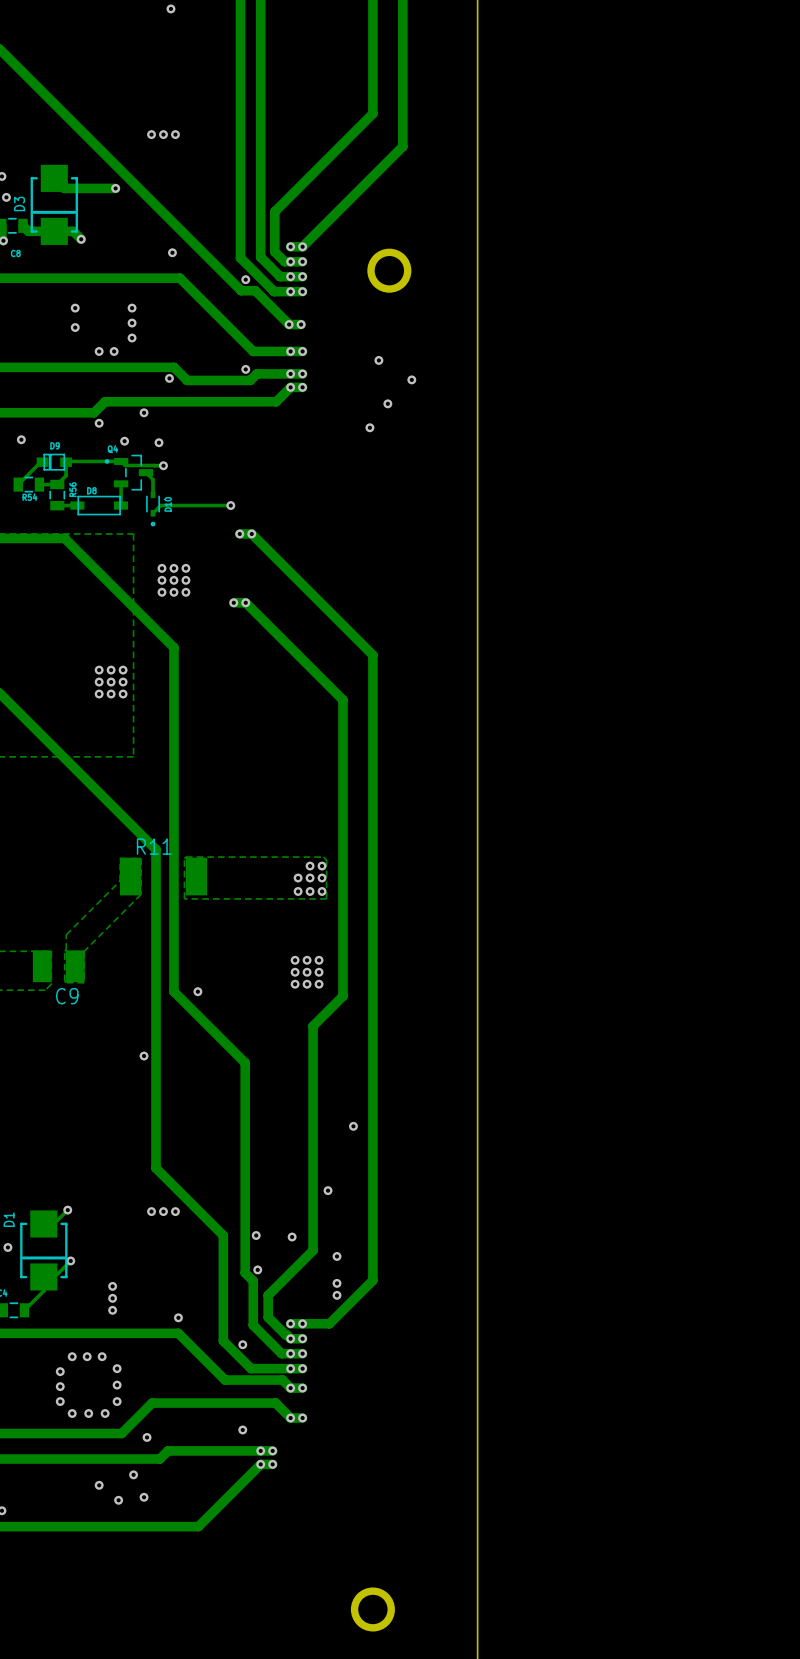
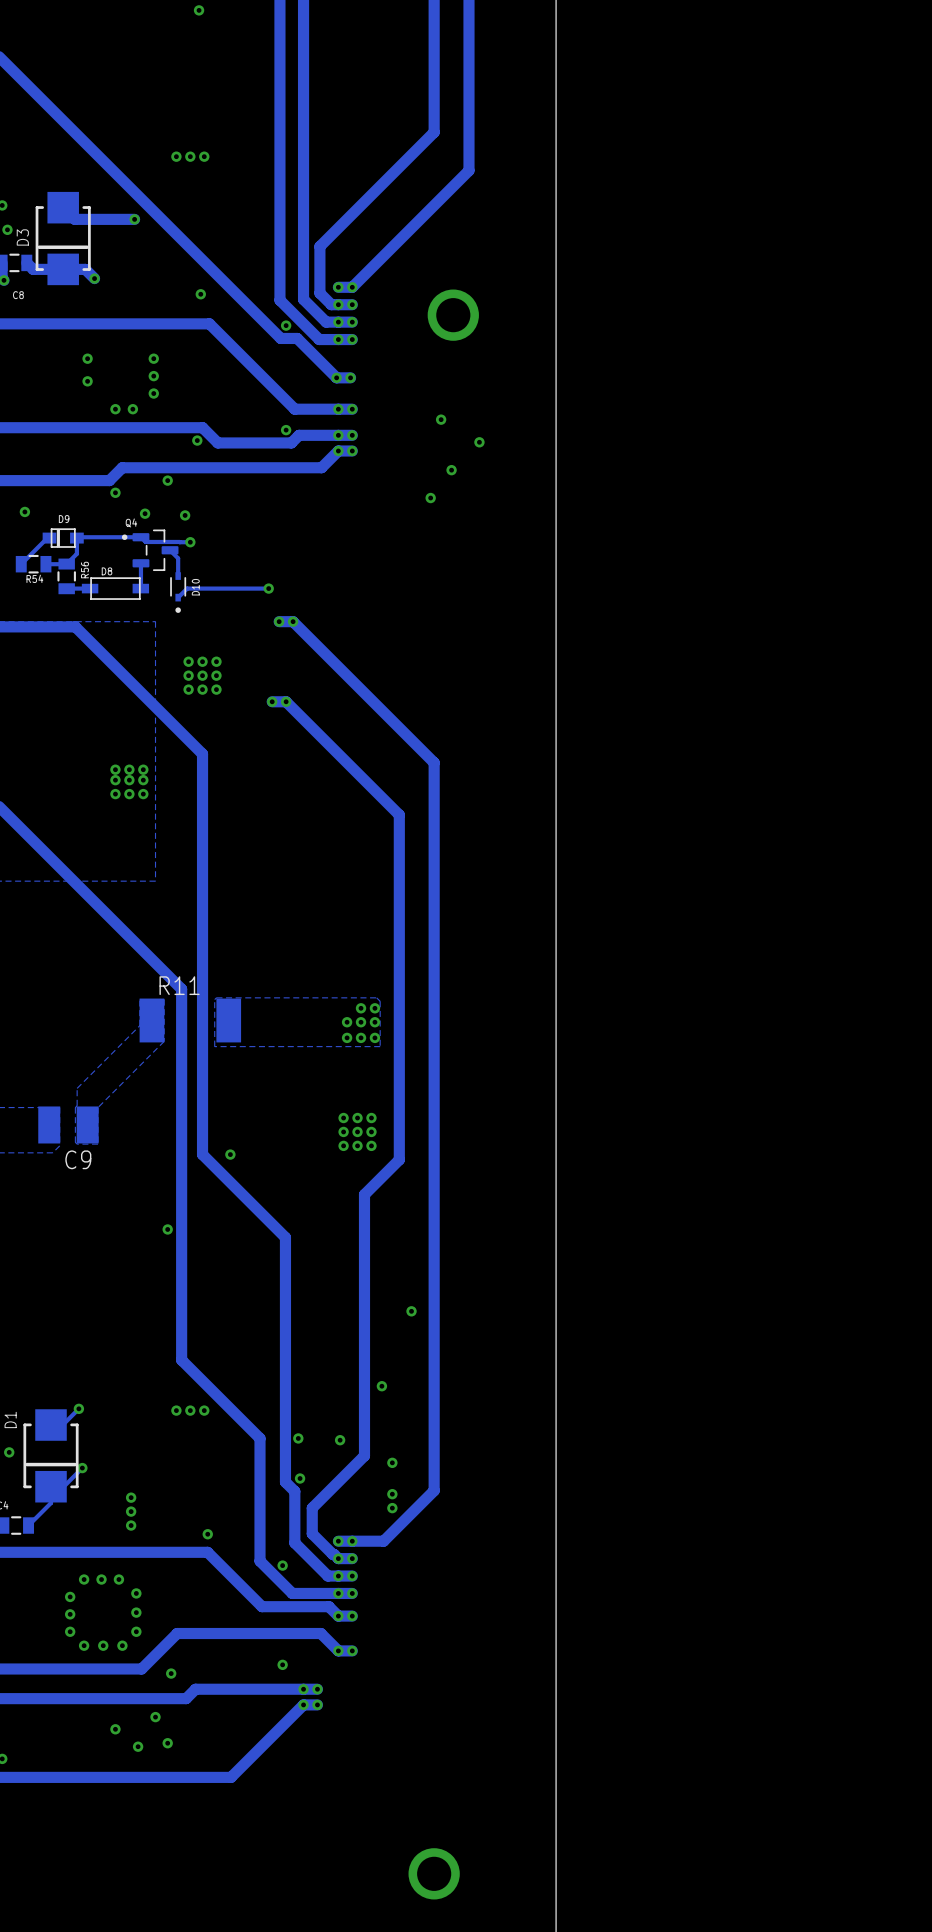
via: none -> (115, 769)
via: none -> (129, 769)
via: none -> (143, 769)
via: (99, 694) -> none
via: (111, 694) -> none
via: (123, 694) -> none

